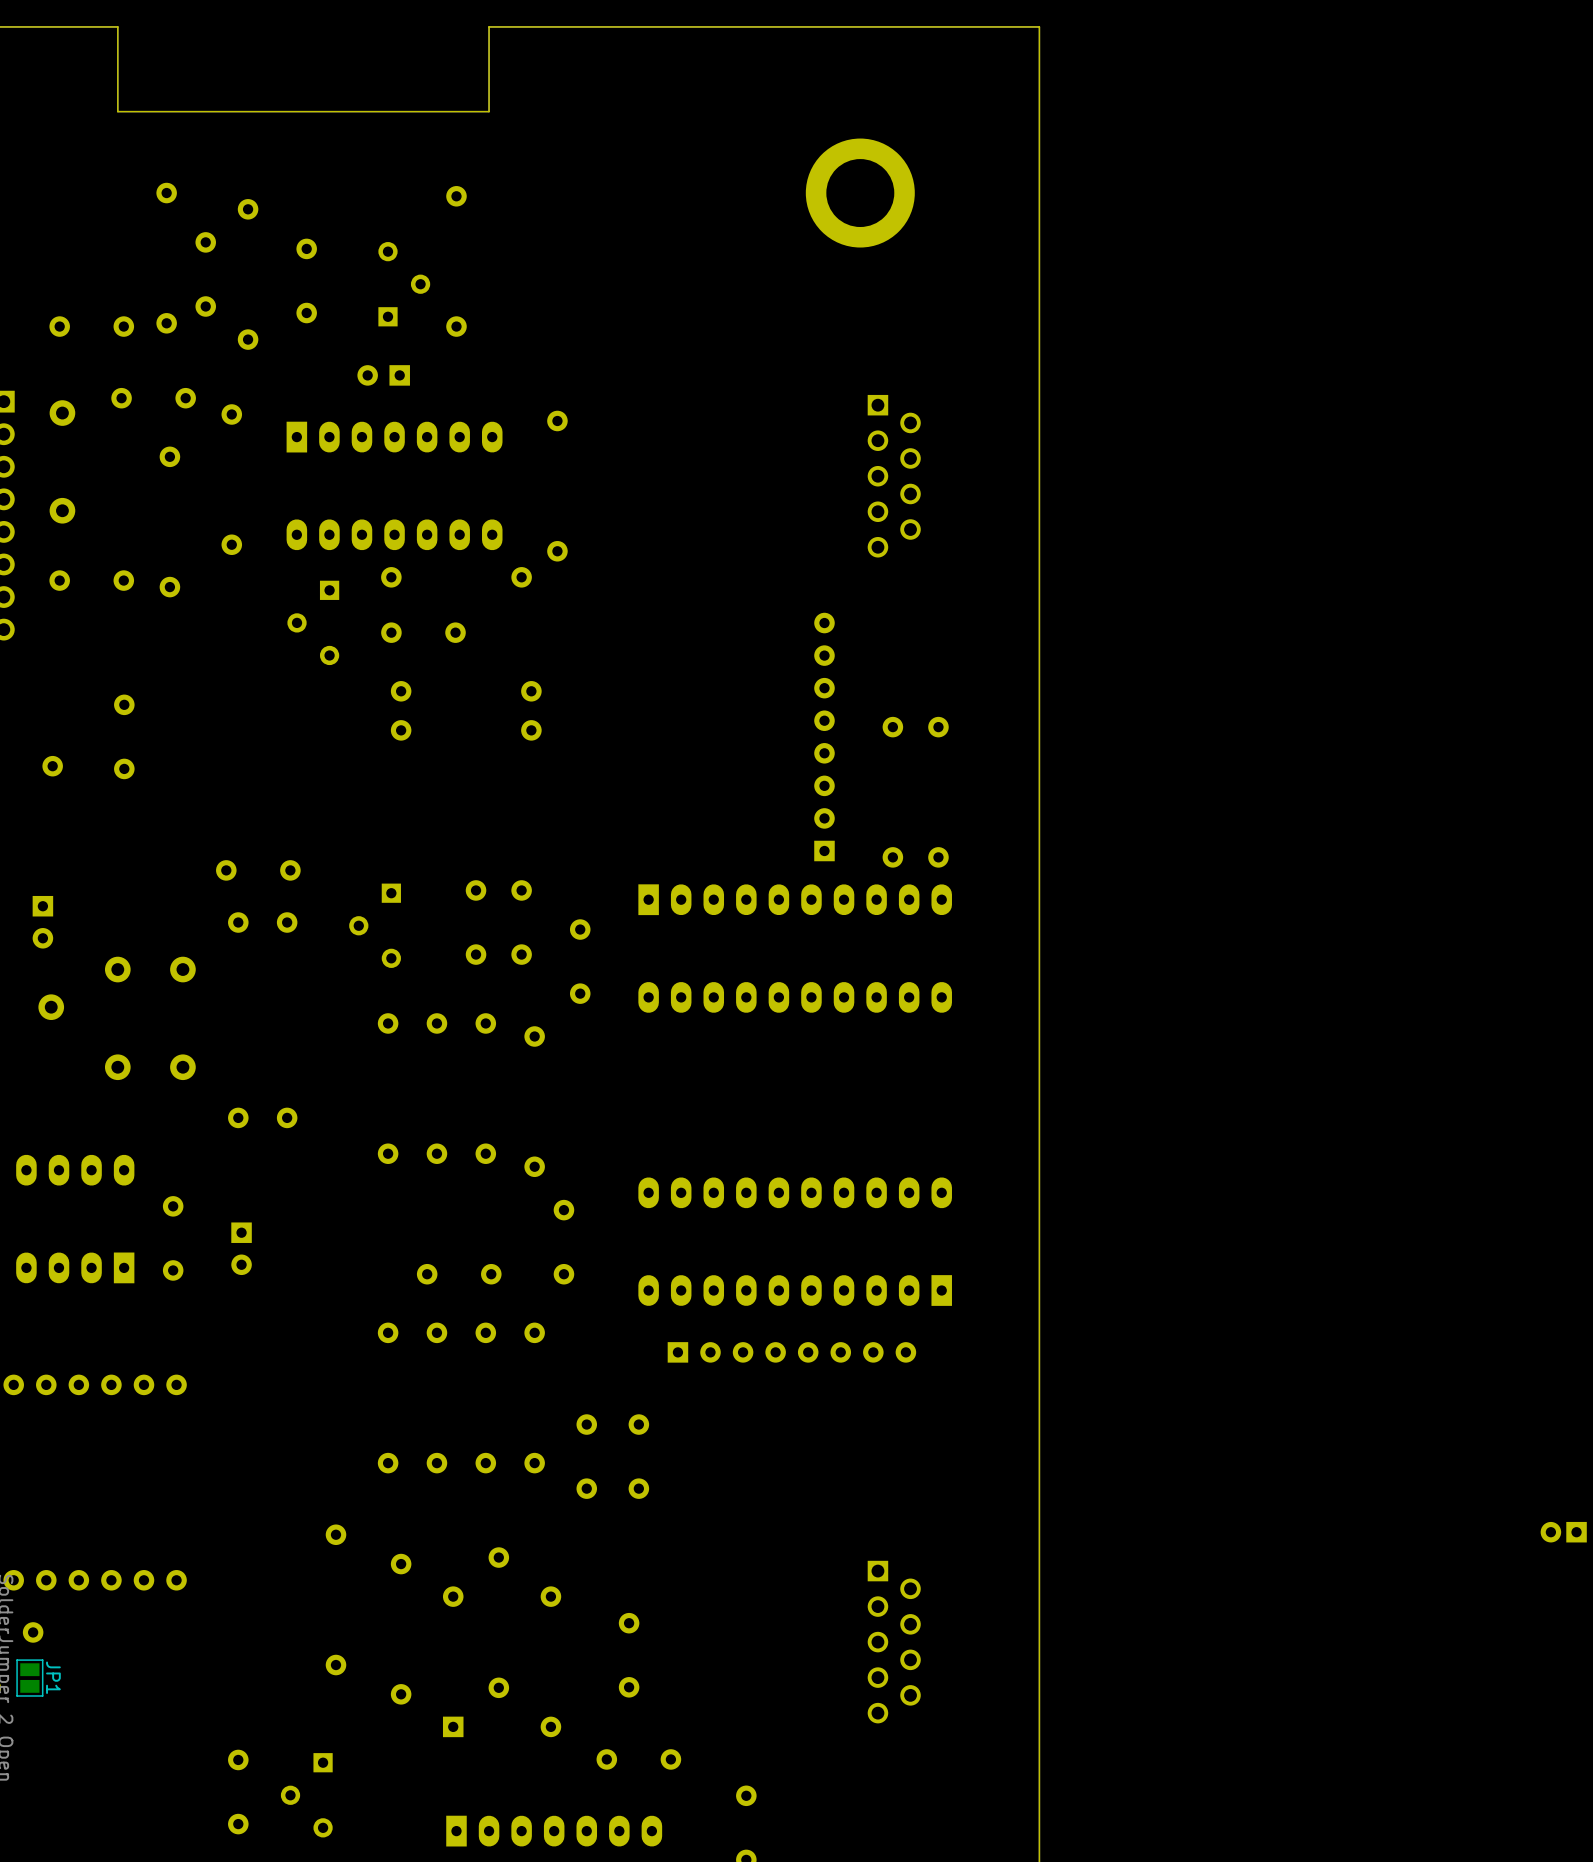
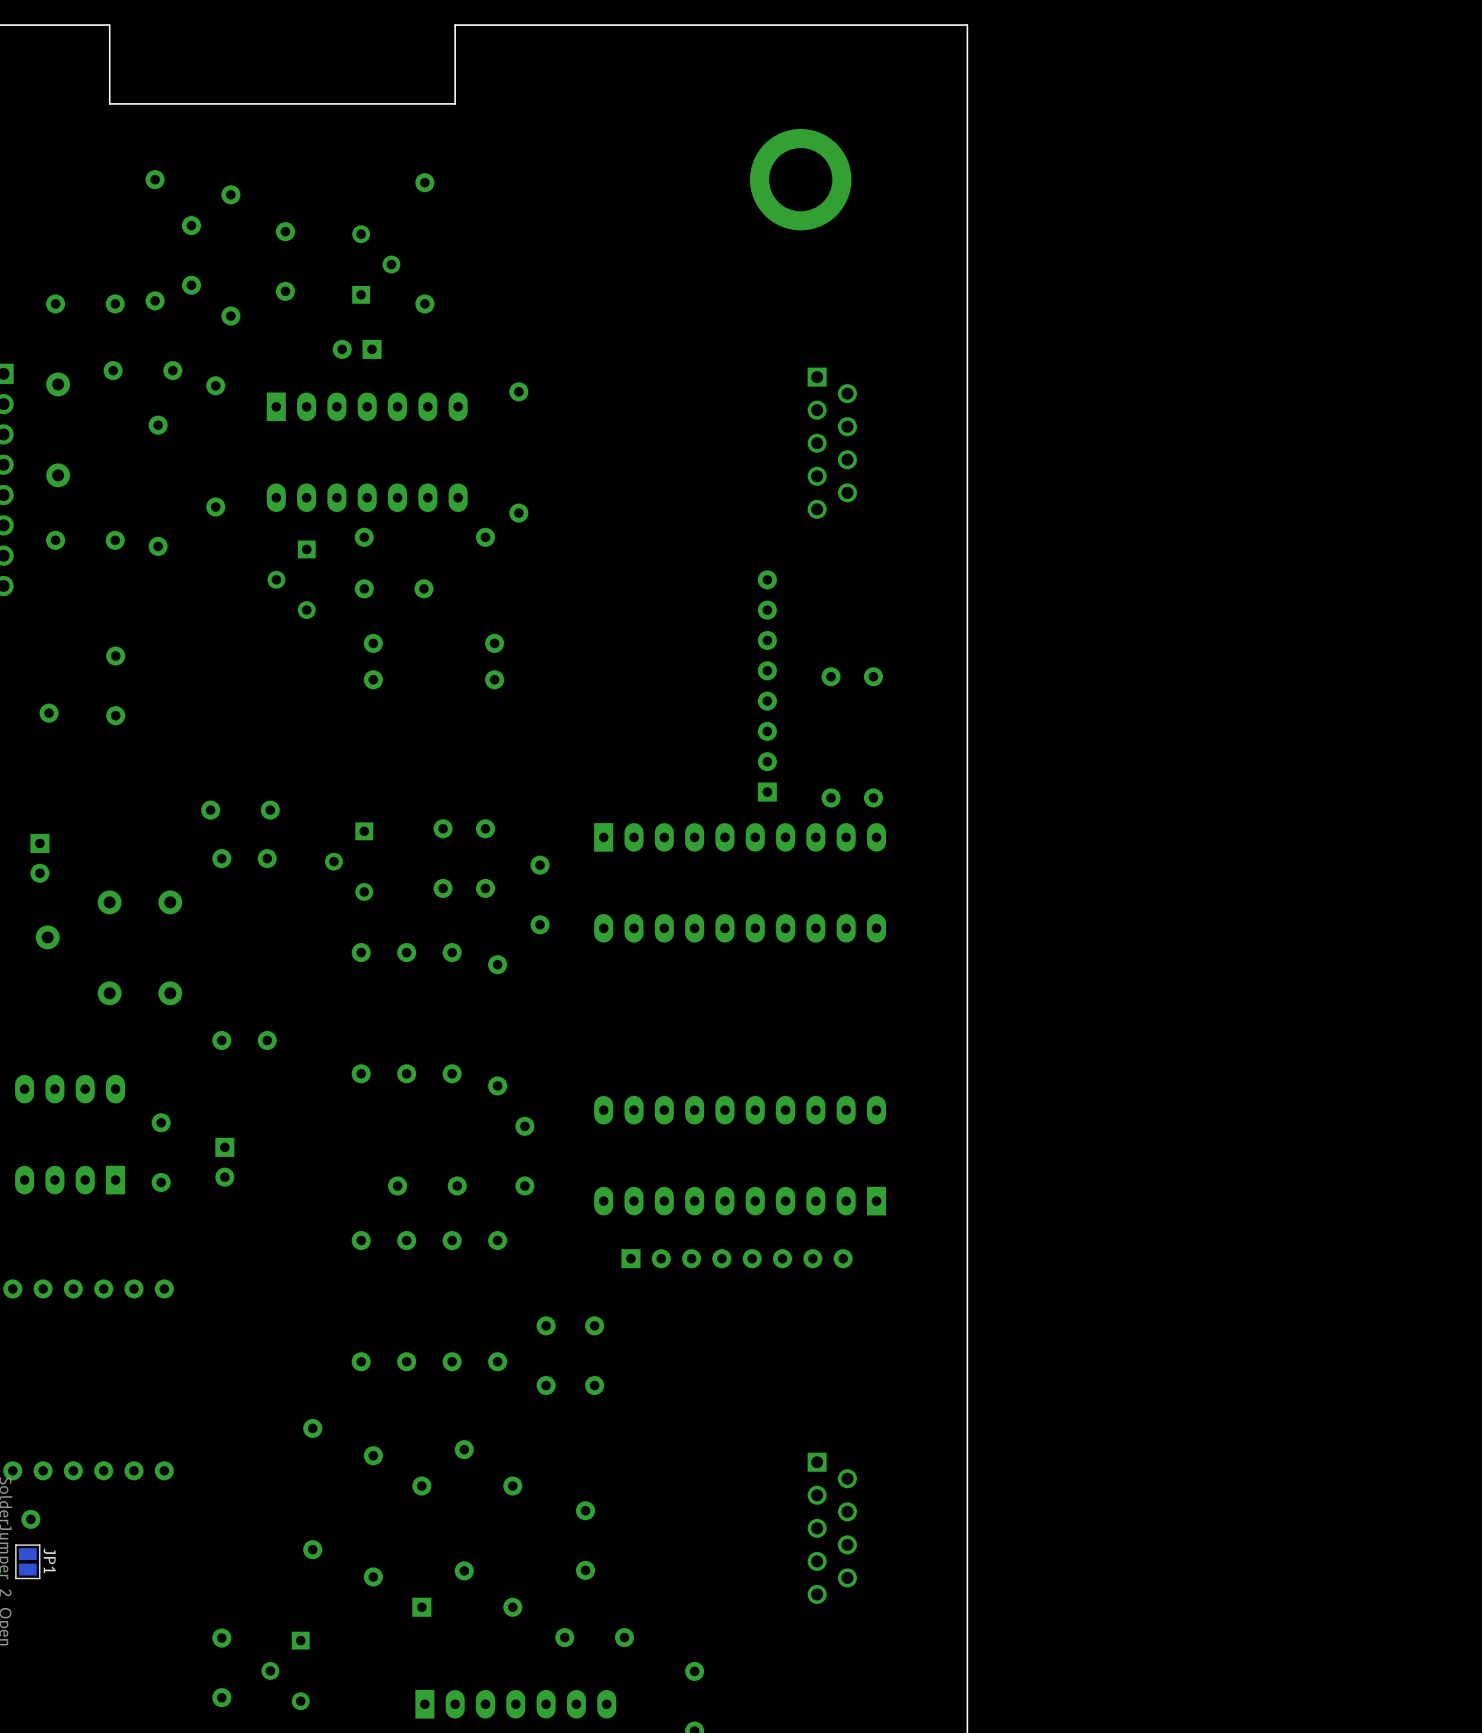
part: (1563, 1532) -> none

